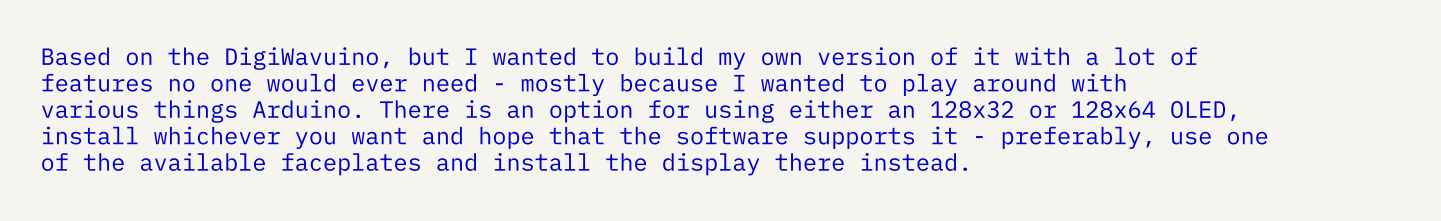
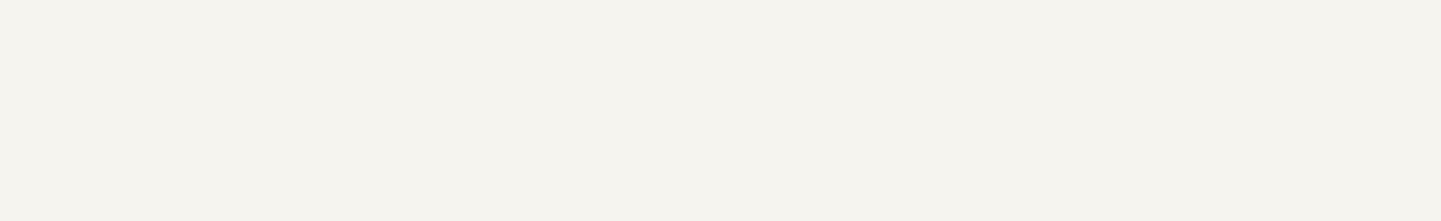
text: Based on the DigiWavuino, but I wanted to build my own version of it with a lot of (619, 58) -> none
text: features no one would ever need - mostly because I wanted to play around with (583, 84) -> none
text: various things Arduino. There is an option for using either an 128x32 or 128x64 OLED, (638, 111) -> none
text: install whichever you want and hope that the software supports it - preferably, use one (655, 137) -> none
text: of the available faceplates and install the display there instead. (504, 164) -> none

